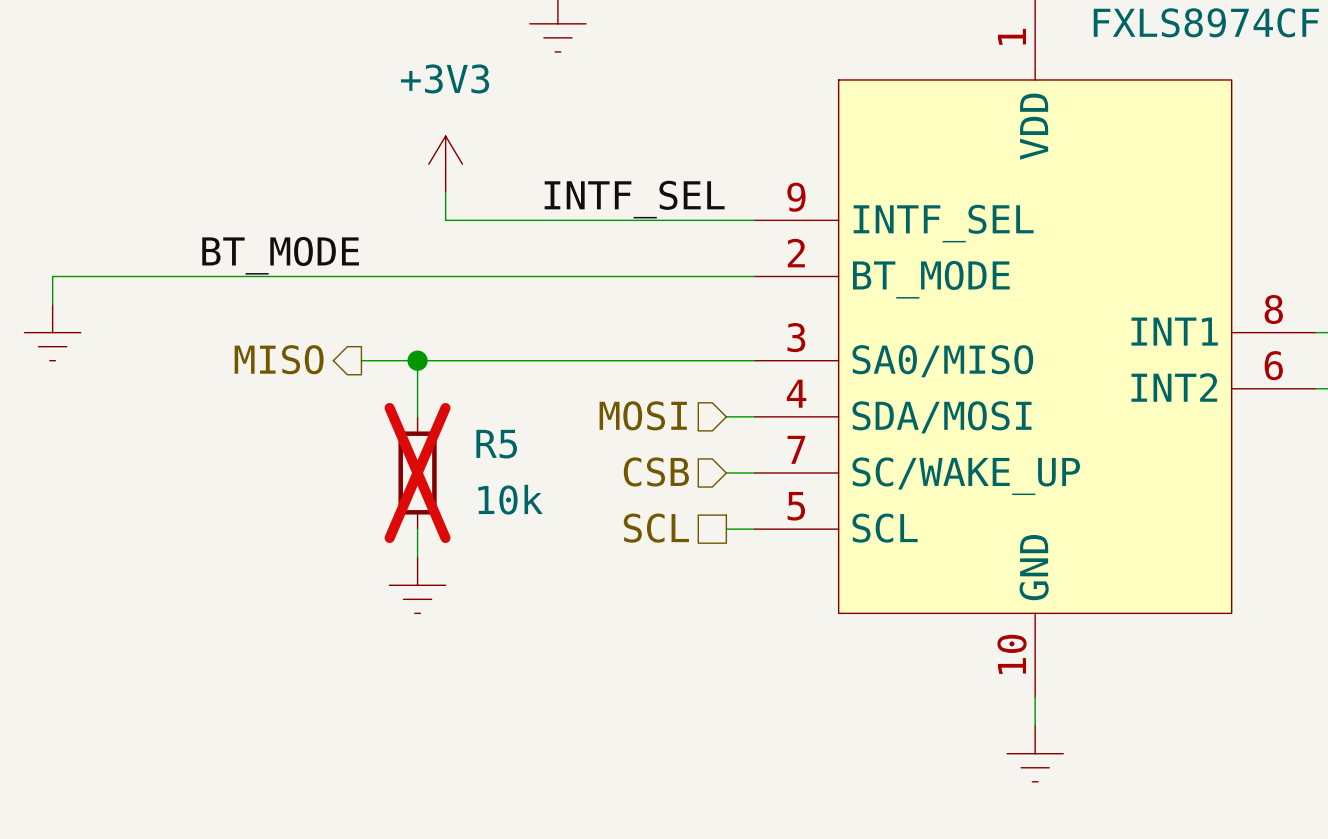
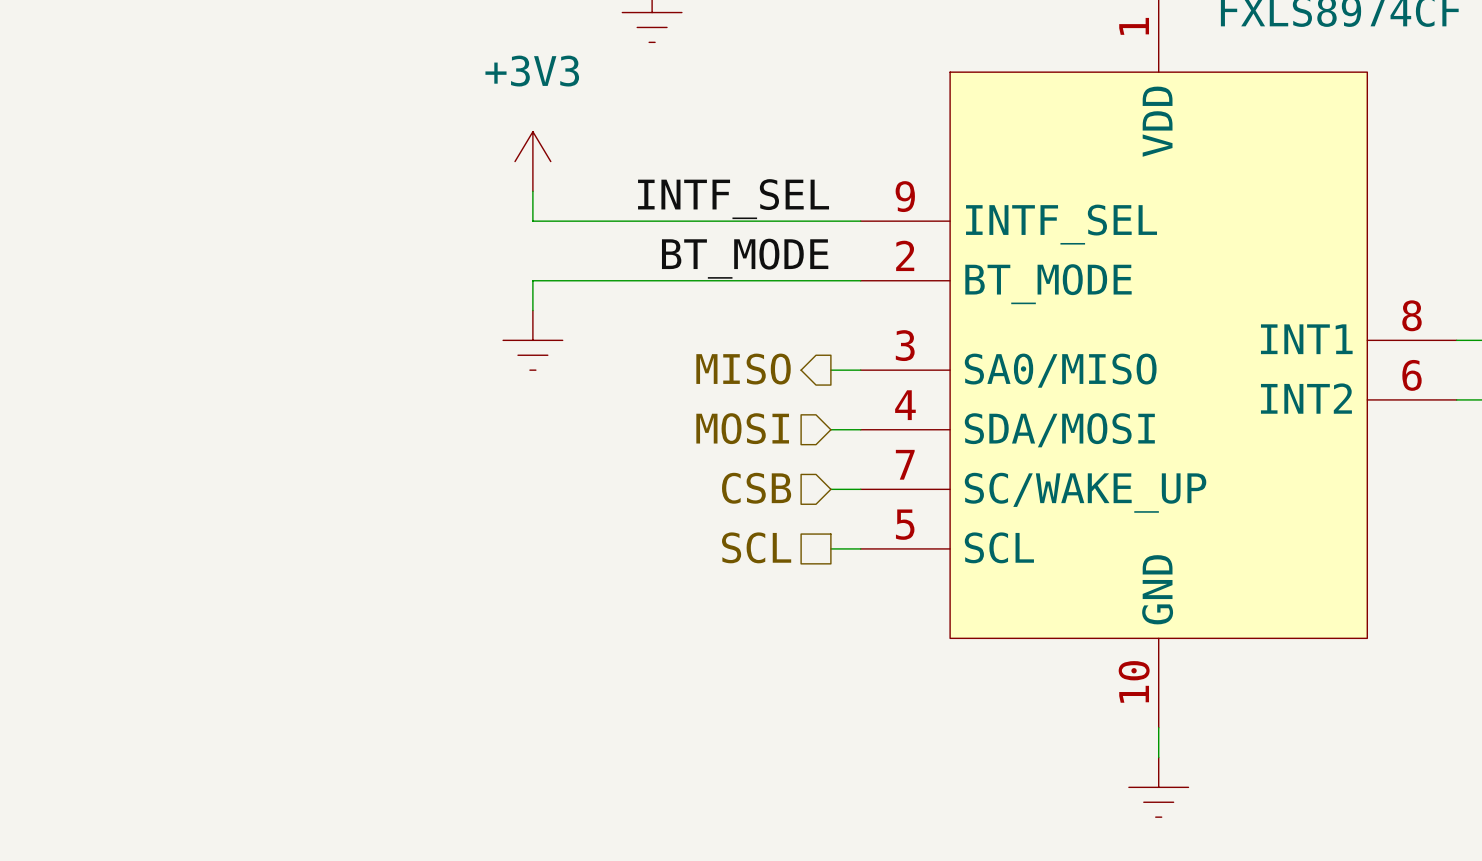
label position: BT_MODE (280, 255) -> BT_MODE (745, 258)
wire: (445, 276) (52, 276) (52, 304) -> (532, 280) (532, 310)
power symbol: (52, 332) -> none
power symbol: none -> (532, 340)
hierarchical label position: MISO (279, 359) -> MISO (743, 369)
wire: (361, 360) (726, 360) -> none
wire: (417, 360) (417, 416) -> none
junction: (417, 360) -> none
R5: 10k (417, 473) -> none
wire: (417, 529) (417, 557) -> none
power symbol: (417, 585) -> none

